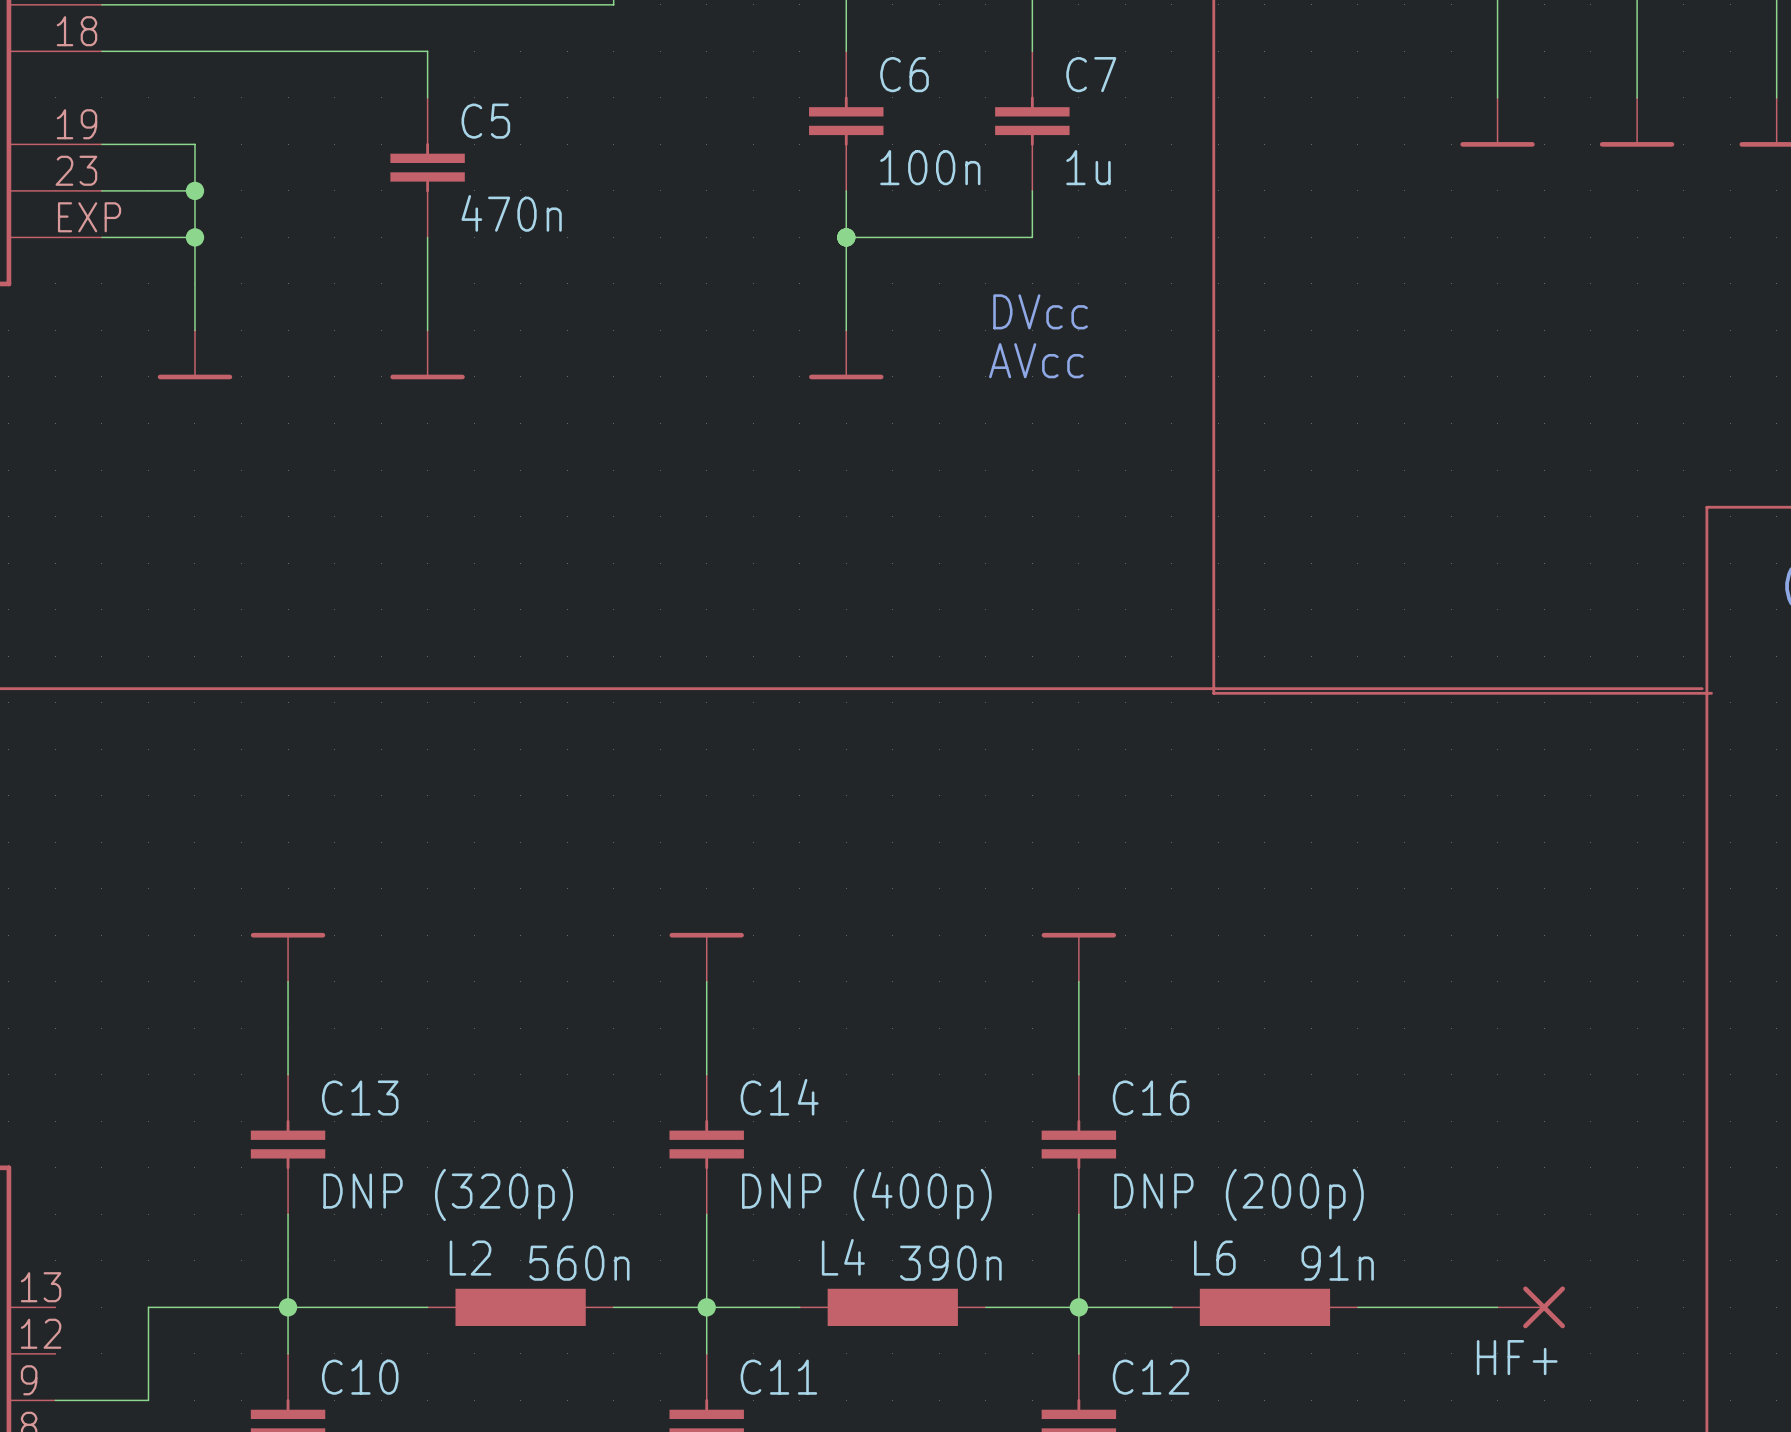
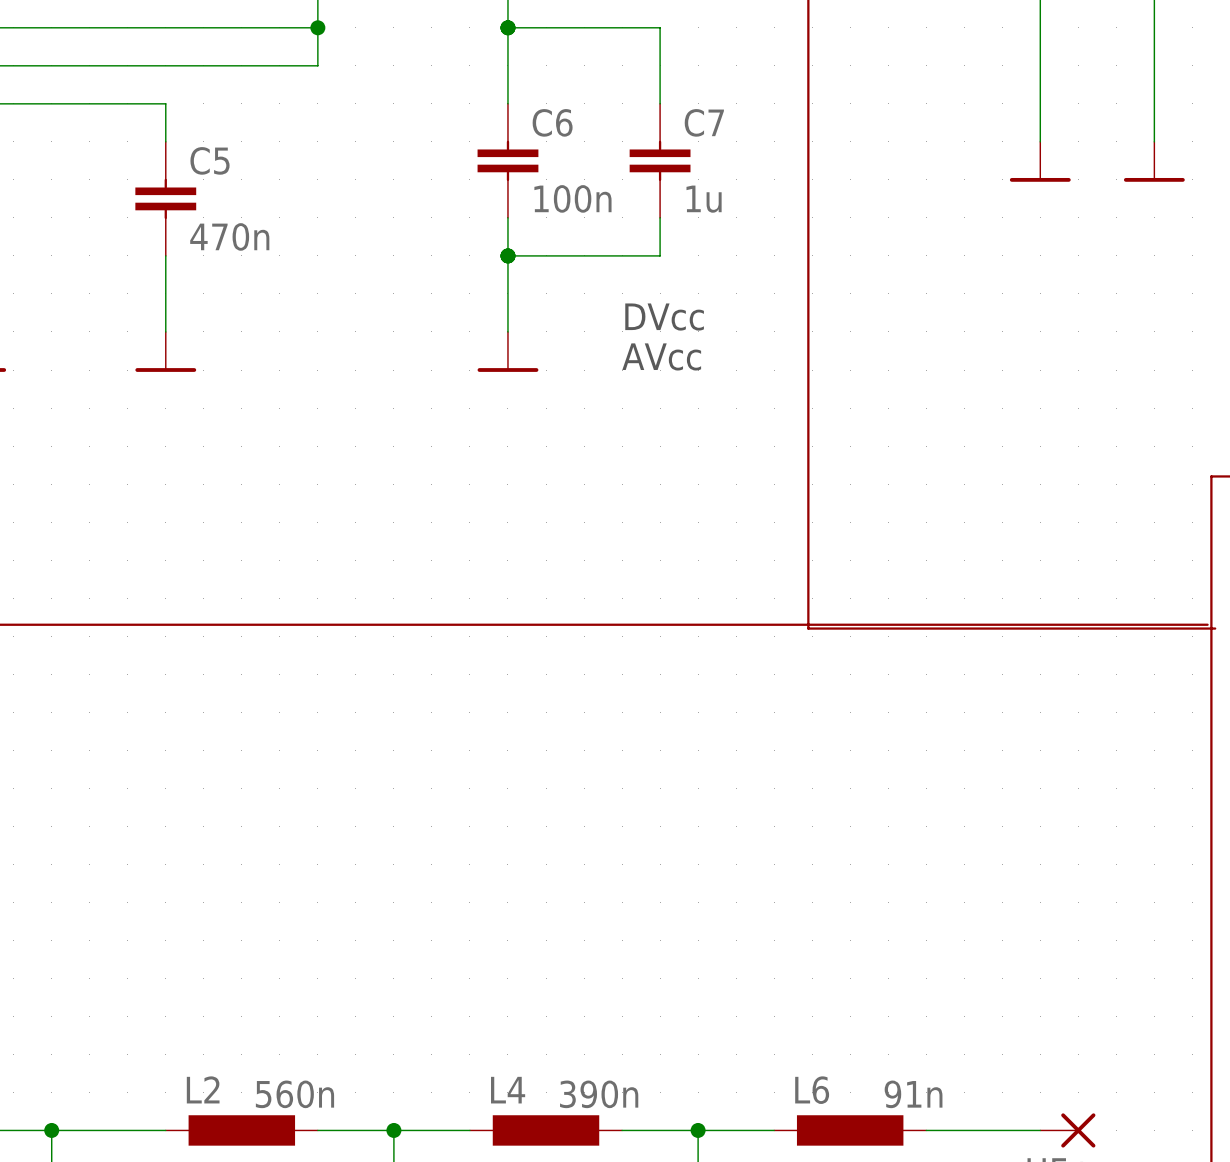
power symbol: (288, 957) -> none
power symbol: (706, 957) -> none
power symbol: (1078, 957) -> none
wire: (288, 981) (288, 1074) -> none
wire: (706, 981) (706, 1074) -> none
wire: (1078, 981) (1078, 1074) -> none
C13: DNP (320p) (288, 1144) -> none
C14: DNP (400p) (706, 1144) -> none
C16: DNP (200p) (1078, 1144) -> none
wire: (288, 1214) (288, 1307) -> none
wire: (706, 1214) (706, 1307) -> none
wire: (1078, 1214) (1078, 1307) -> none

